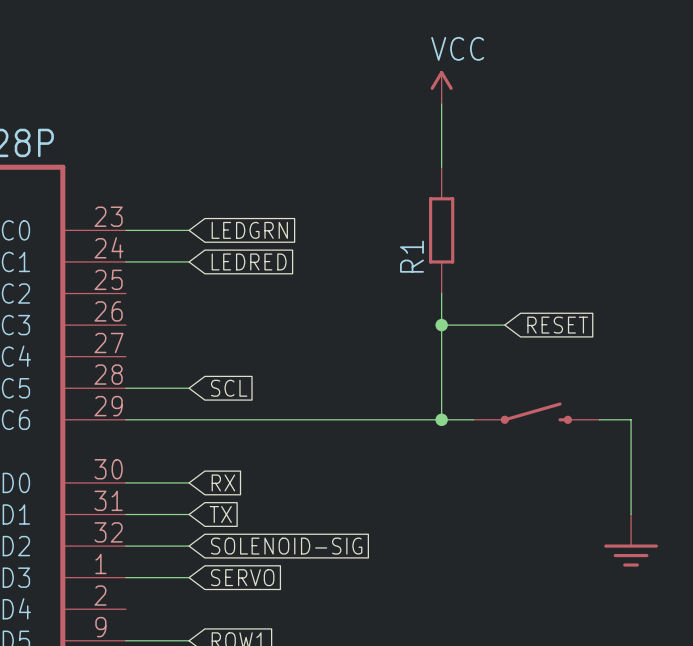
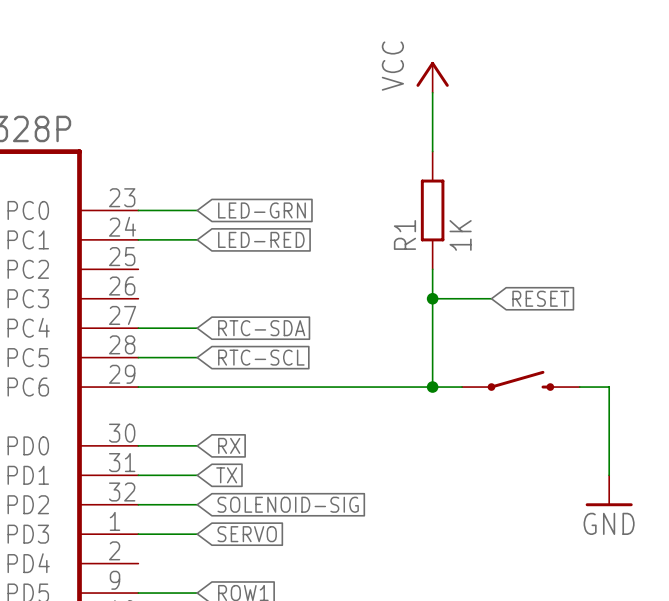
power symbol text rotation: 0° (457, 48) -> 90° counterclockwise (392, 66)
power symbol shape: [430, 70, 453, 105] -> [416, 61, 449, 93]
global label: LEDGRN (249, 230) -> LED-GRN (261, 210)
R1 value: none -> 1K (460, 235)
global label: LEDRED (249, 261) -> LED-RED (261, 239)
wire: none -> (138, 328) (197, 328)
global label: none -> RTC-SDA (261, 328)
global label: SCL (229, 388) -> RTC-SCL (261, 357)
power symbol shape: [604, 514, 658, 567] -> [585, 475, 633, 507]
power symbol text: none -> GND (609, 523)

